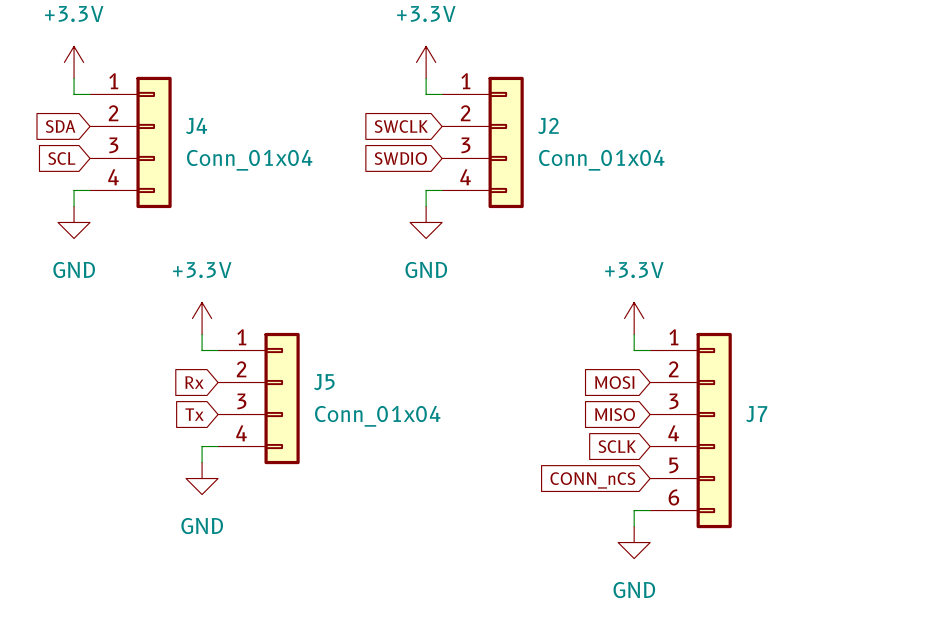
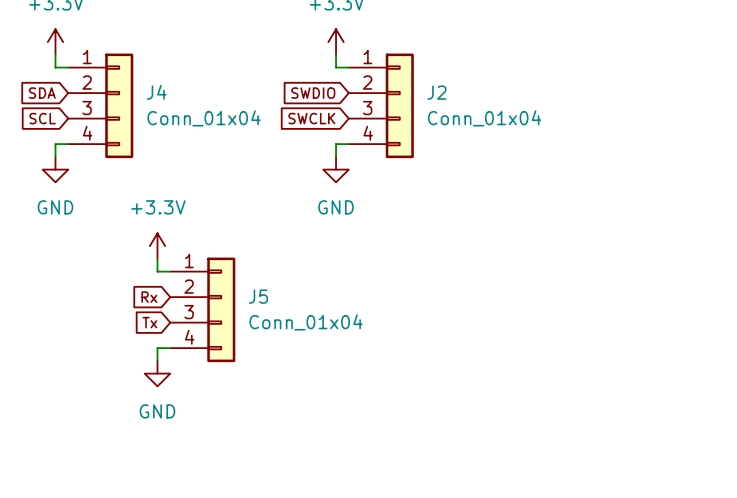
global label: SWCLK (401, 126) -> SWDIO (313, 93)
global label: SWDIO (400, 158) -> SWCLK (311, 118)
power symbol: +3.3V (634, 318) -> none
wire: (634, 334) (634, 350) (650, 350) -> none
global label: MOSI (614, 382) -> none
global label: MISO (615, 414) -> none
J7: (690, 430) -> none
global label: SCLK (617, 446) -> none
global label: CONN_nCS (592, 480) -> none
wire: (650, 510) (634, 510) (634, 526) -> none
power symbol: GND (634, 542) -> none

